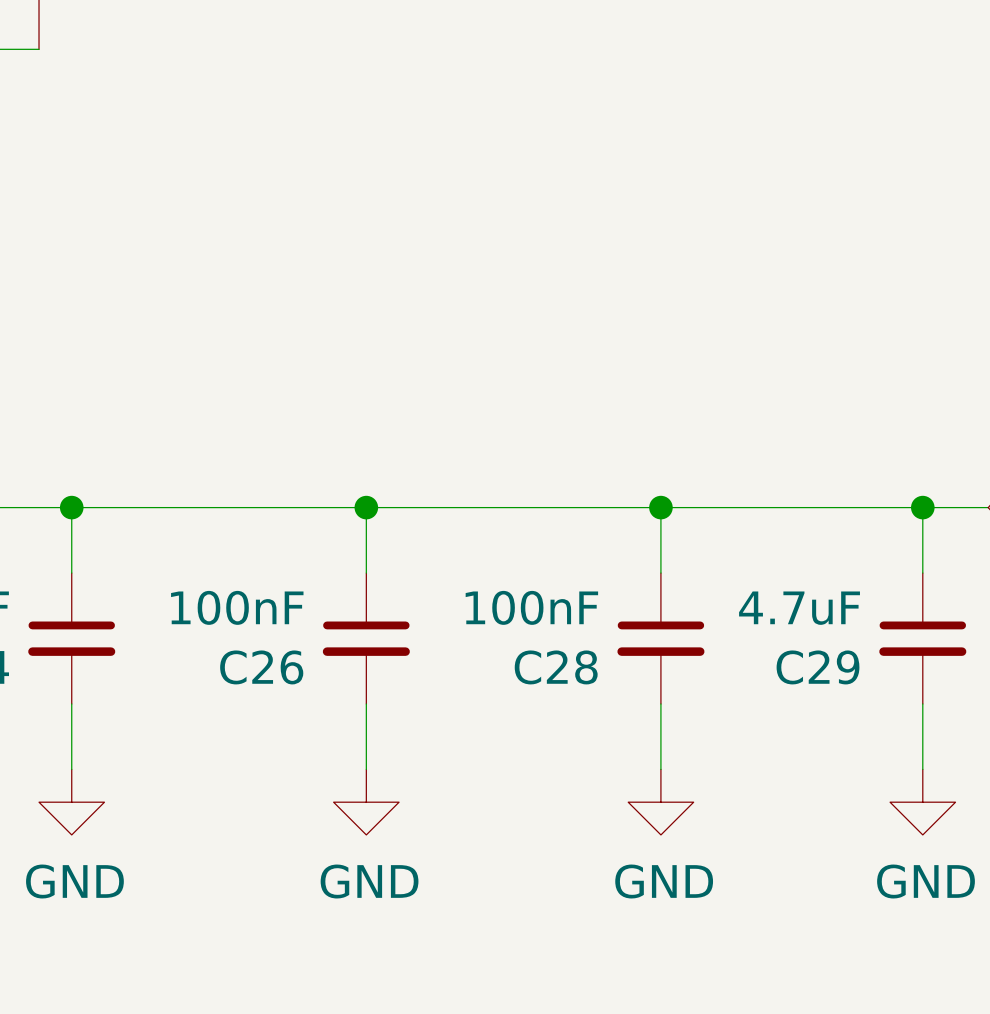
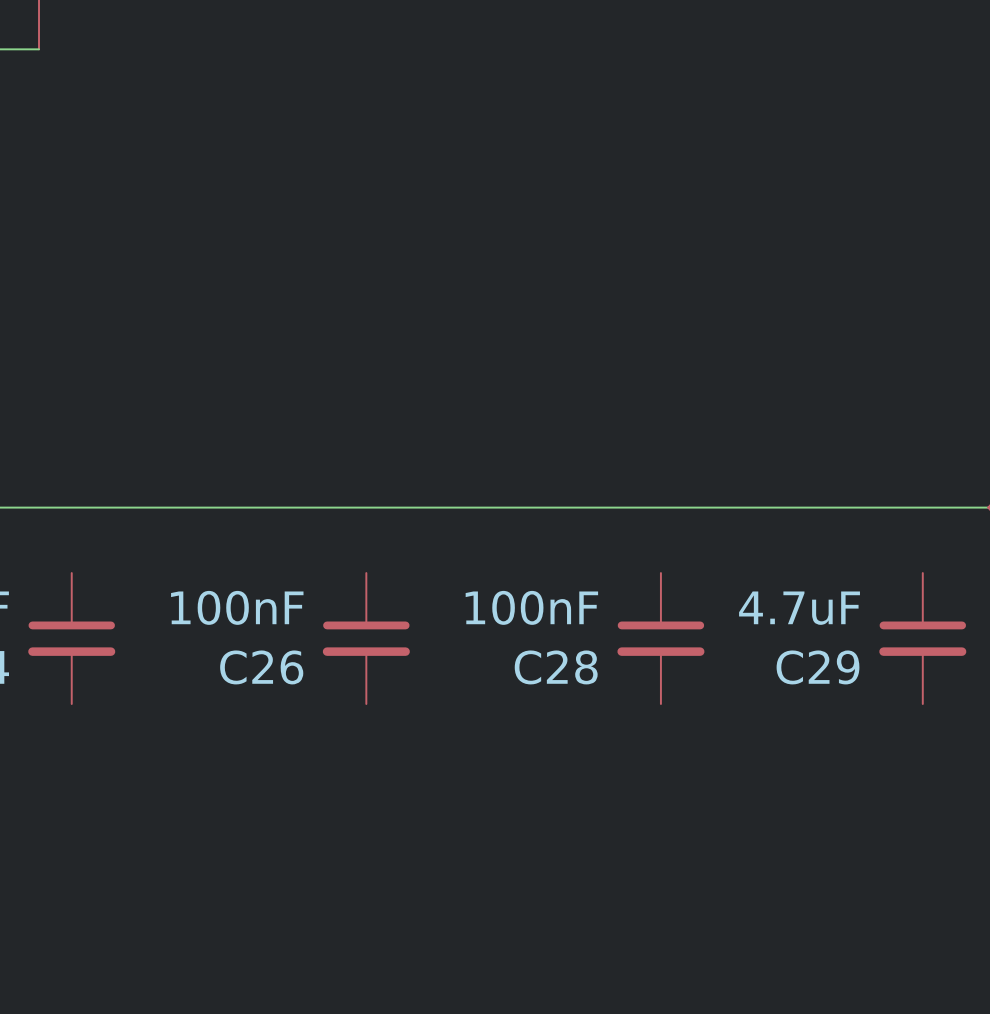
wire: (71, 507) (71, 573) -> none
junction: (71, 507) -> none
wire: (366, 507) (366, 573) -> none
junction: (366, 507) -> none
wire: (660, 507) (660, 573) -> none
junction: (660, 507) -> none
wire: (922, 507) (922, 573) -> none
junction: (922, 507) -> none
wire: (71, 703) (71, 769) -> none
wire: (366, 703) (366, 769) -> none
wire: (660, 703) (660, 769) -> none
wire: (922, 703) (922, 769) -> none
power symbol: GND (71, 802) -> none
power symbol: GND (366, 802) -> none
power symbol: GND (660, 802) -> none
power symbol: GND (922, 802) -> none

